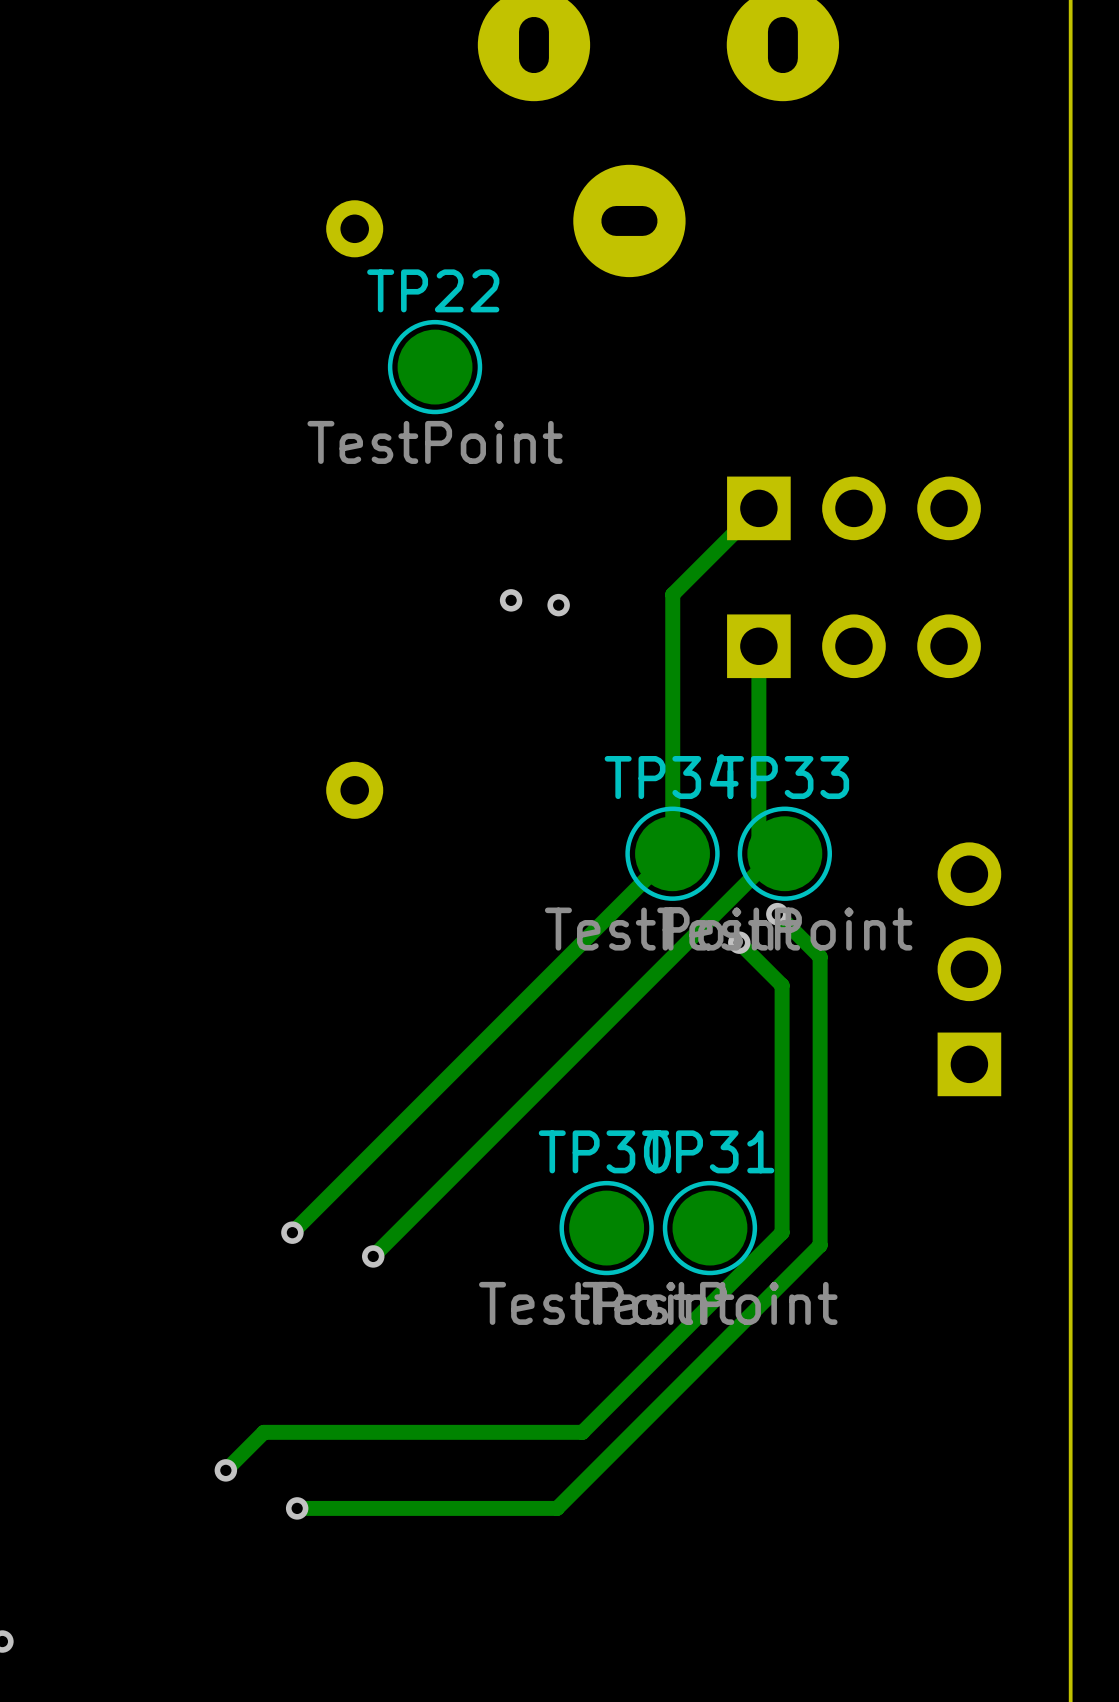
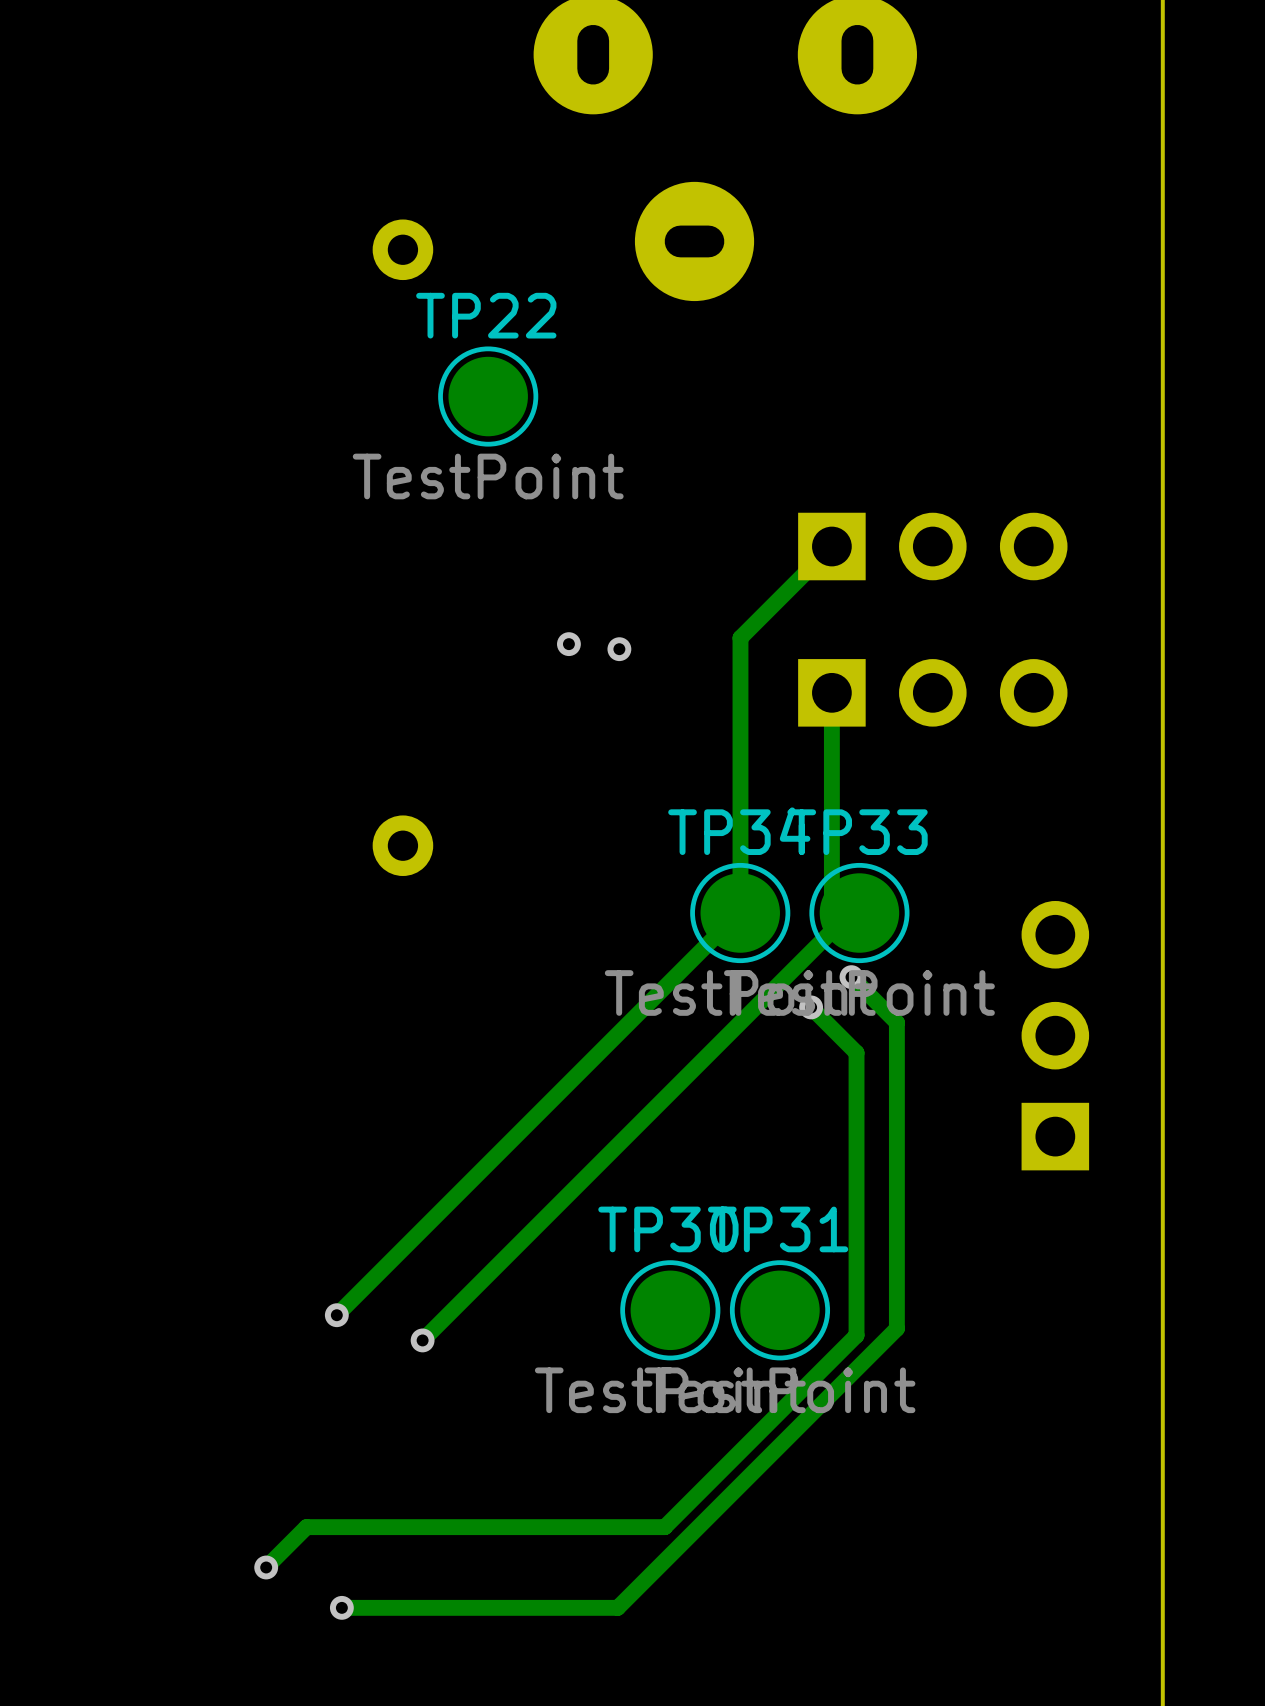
track: (782, 1232) (582, 1432) -> (856, 1315) (856, 1335) (664, 1527) (644, 1527)

